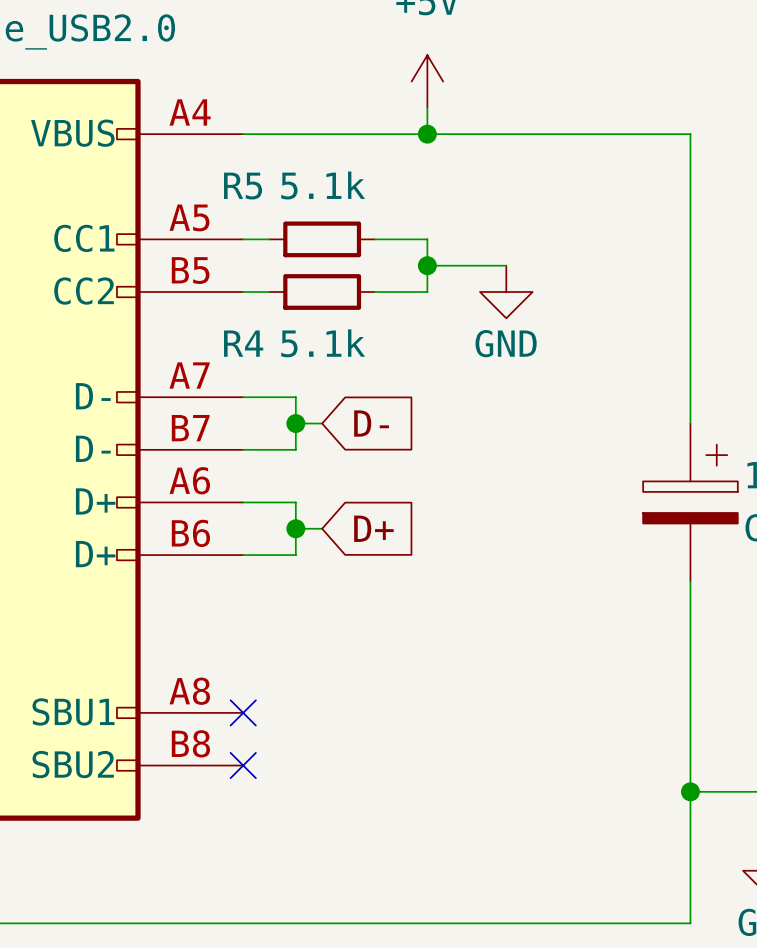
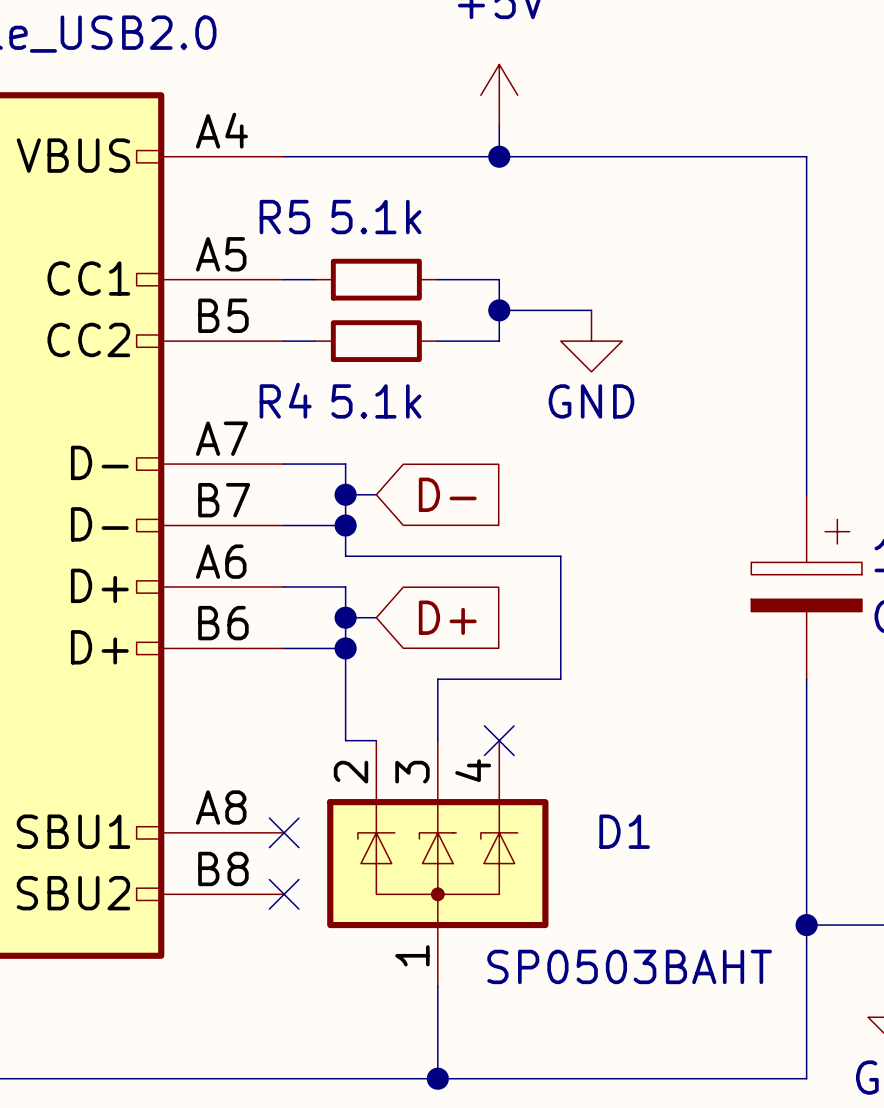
wire: none -> (345, 525) (345, 556) (560, 556) (560, 679) (437, 679) (437, 740)
junction: none -> (345, 525)
wire: none -> (345, 648) (345, 740) (376, 740)
junction: none -> (345, 648)
no-connect mark: none -> (499, 740)
D1: none -> SP0503BAHT (437, 863)
wire: none -> (437, 986) (437, 1078)
junction: none -> (437, 1078)

